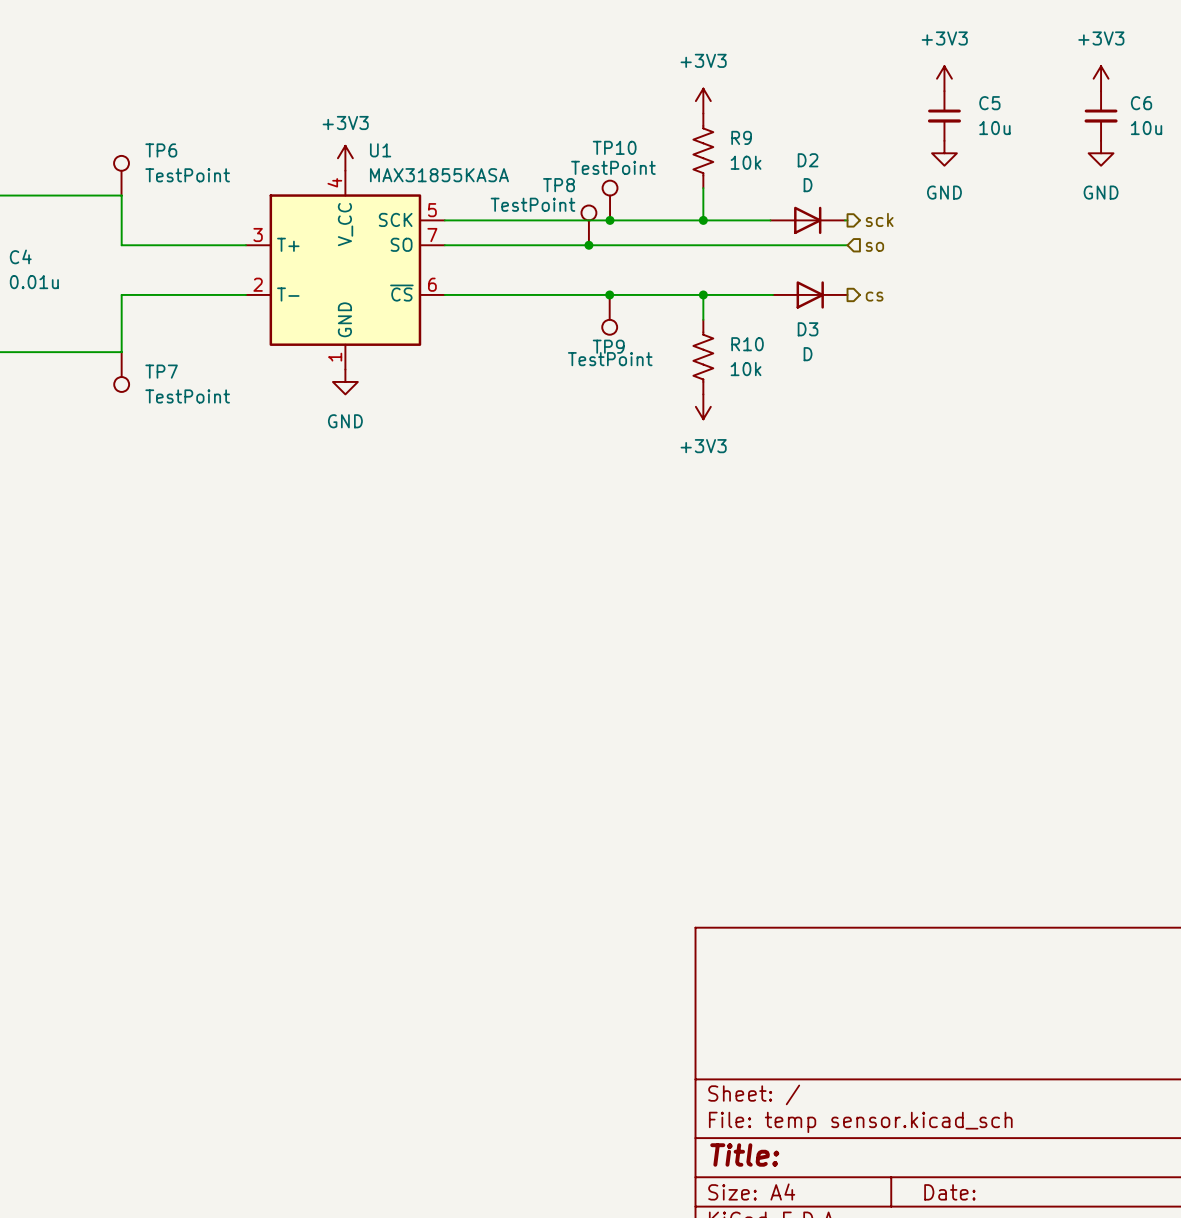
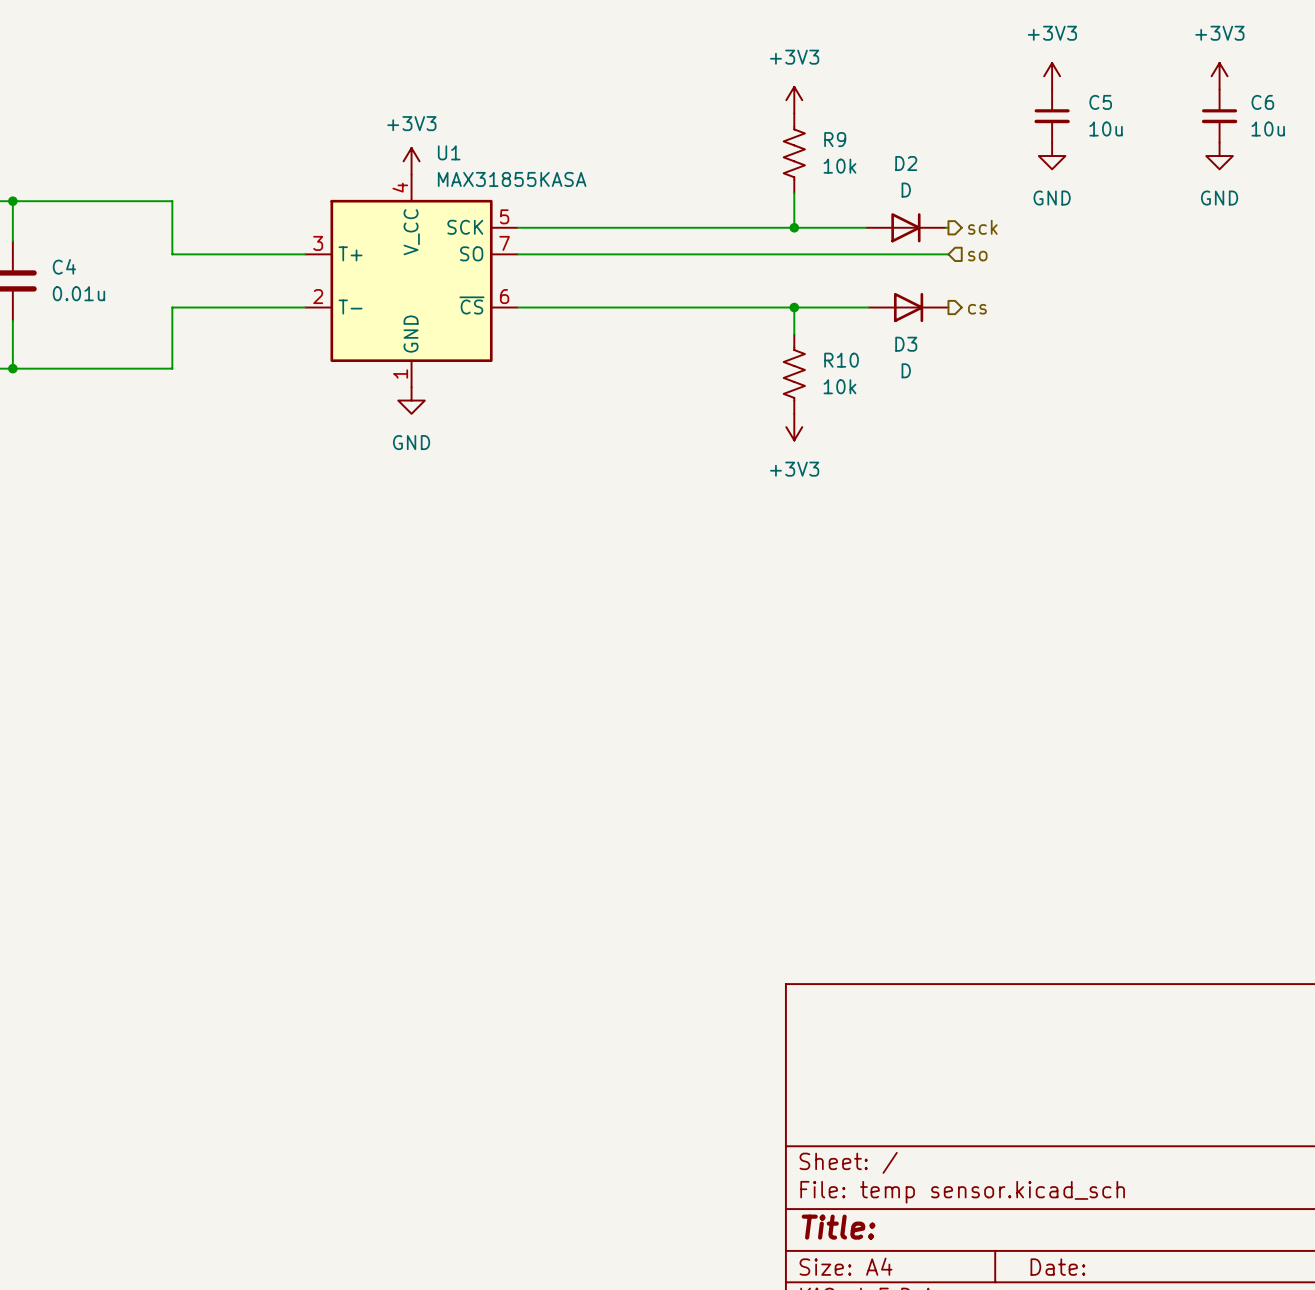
TP6: TestPoint (121, 175) -> none
TP10: TestPoint (610, 200) -> none
junction: (610, 220) -> none
TP8: TestPoint (588, 225) -> none
junction: (588, 245) -> none
junction: (609, 294) -> none
TP9: TestPoint (609, 314) -> none
TP7: TestPoint (121, 372) -> none

